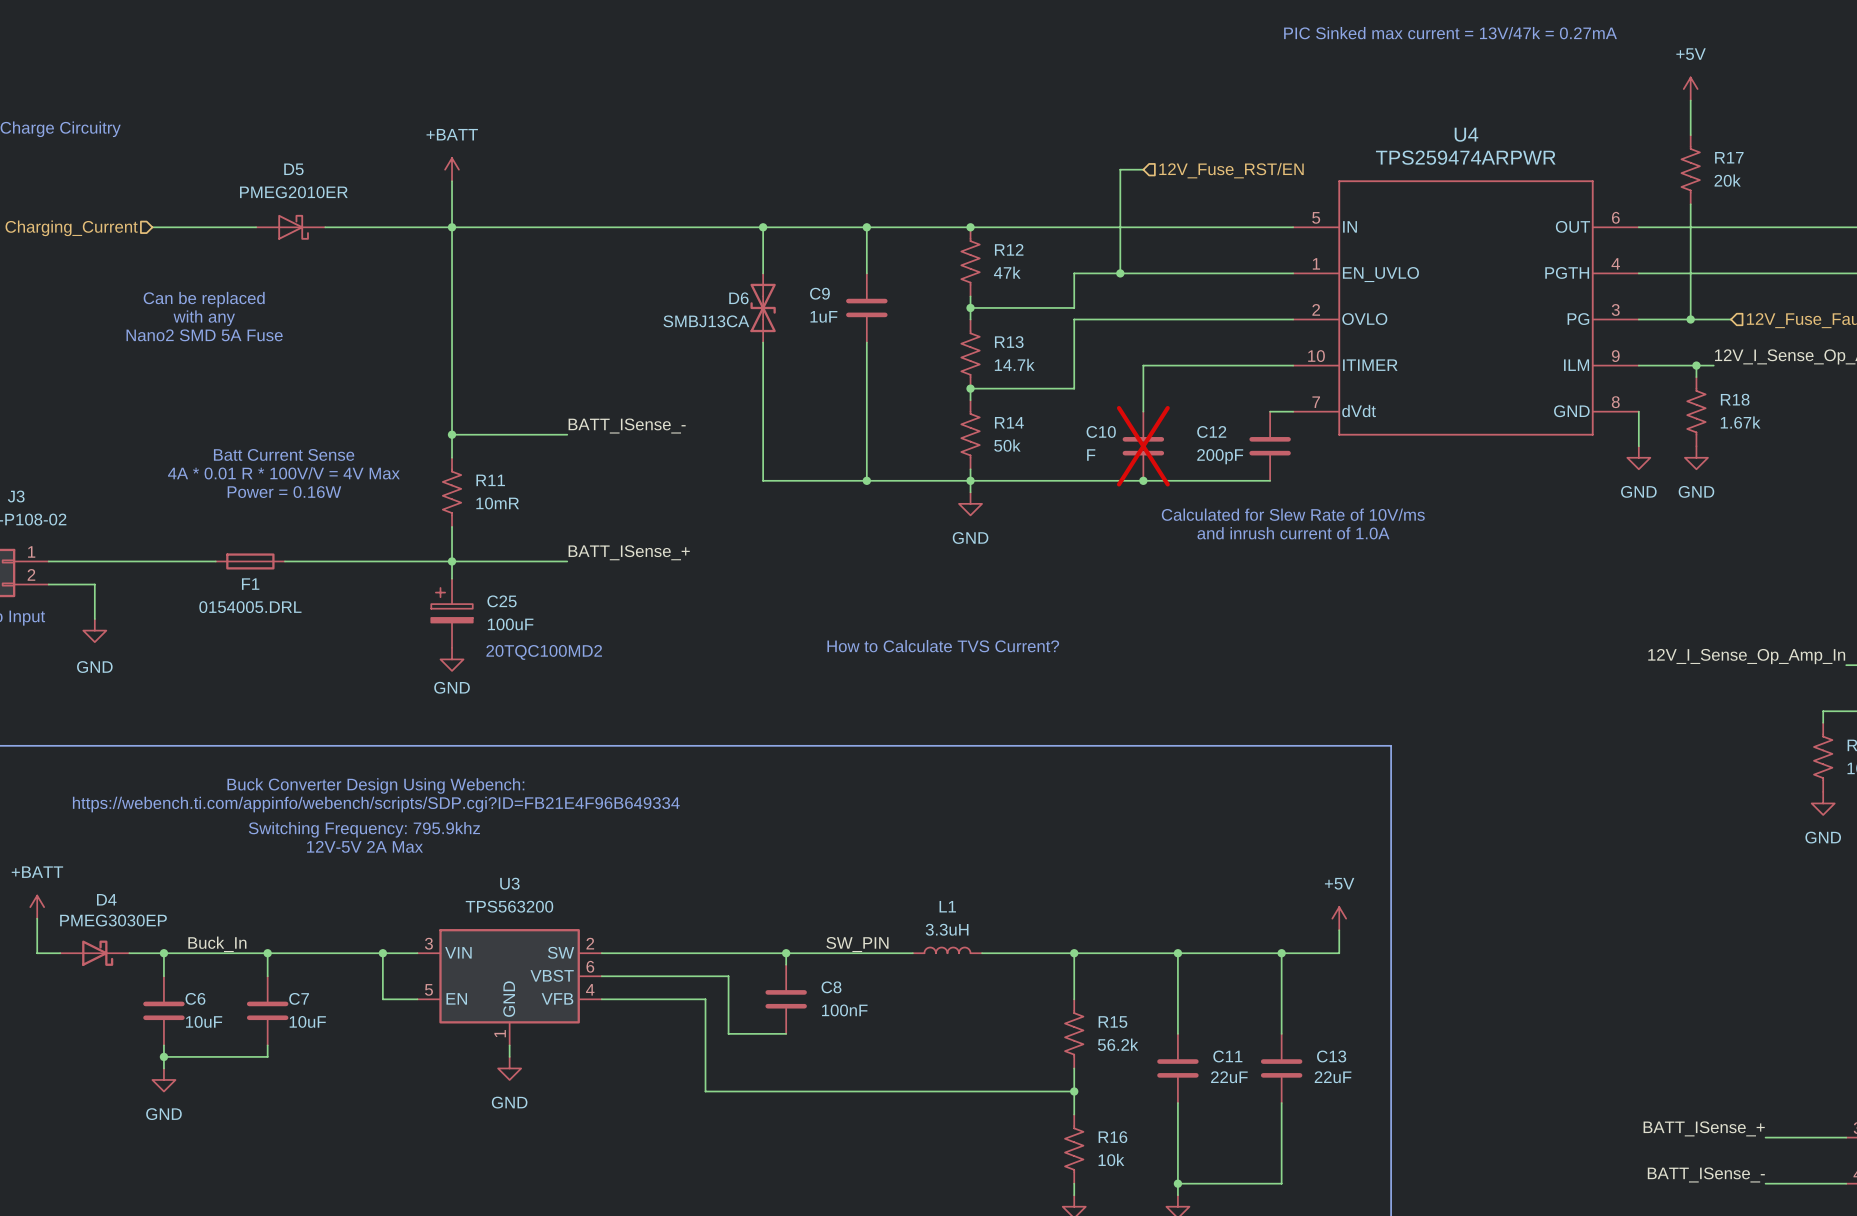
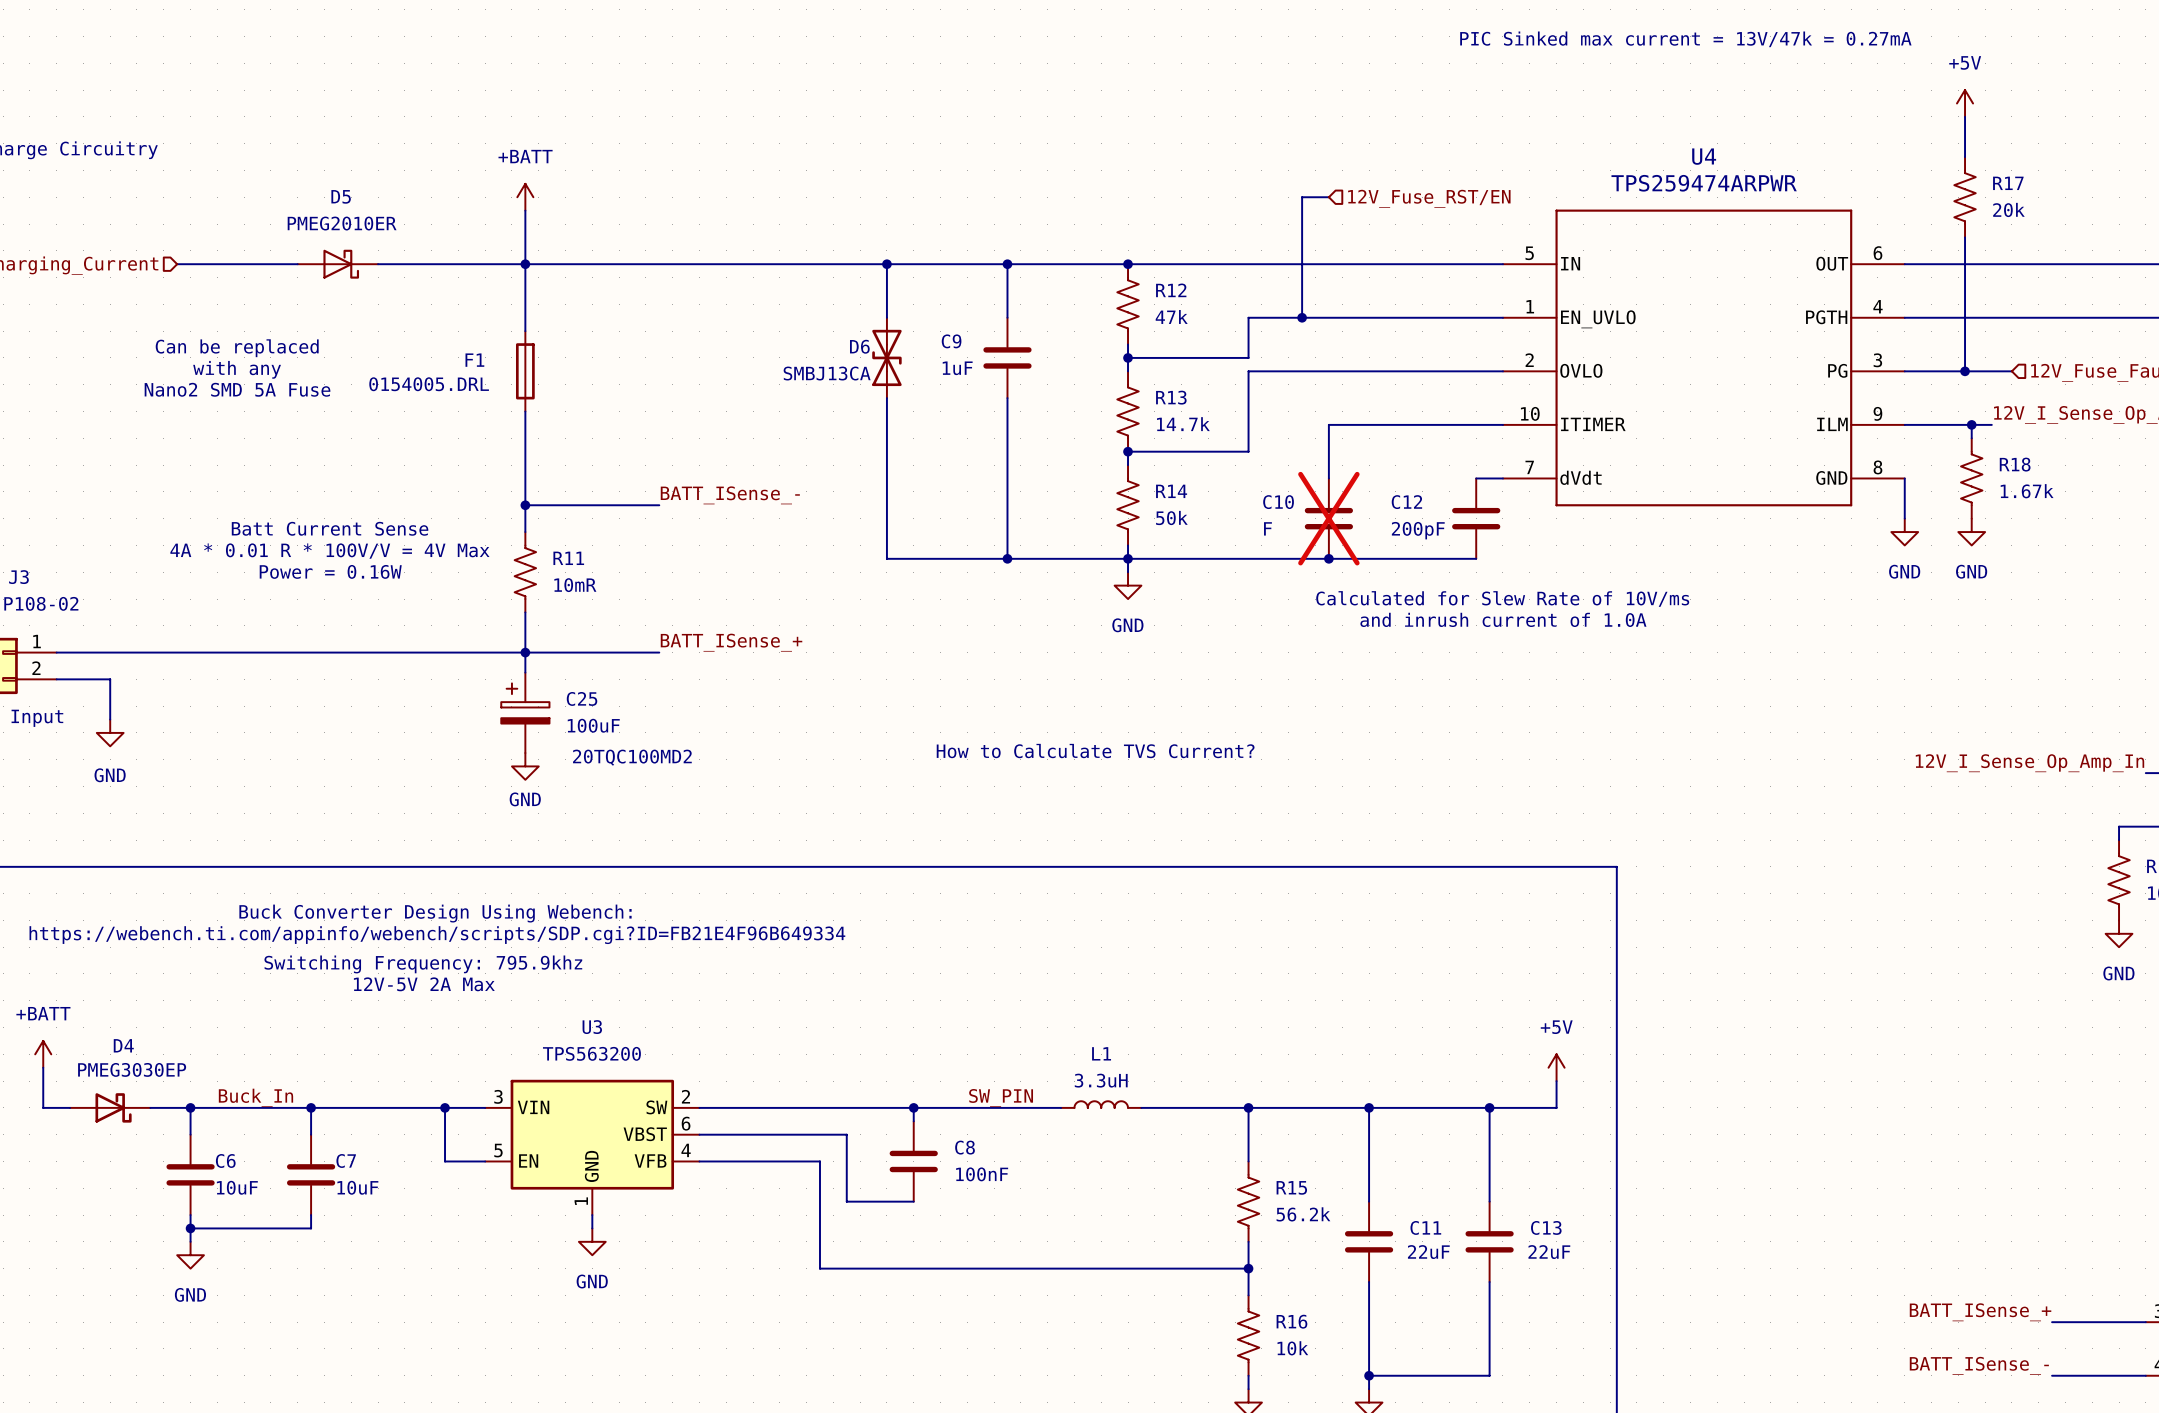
F1 rotation: 0° (250, 561) -> 90° clockwise (525, 371)
F1 position: (250, 561) -> (525, 371)
F1 name position: F1 (250, 584) -> F1 (474, 360)
F1 value position: 0154005.DRL (250, 607) -> 0154005.DRL (429, 384)

